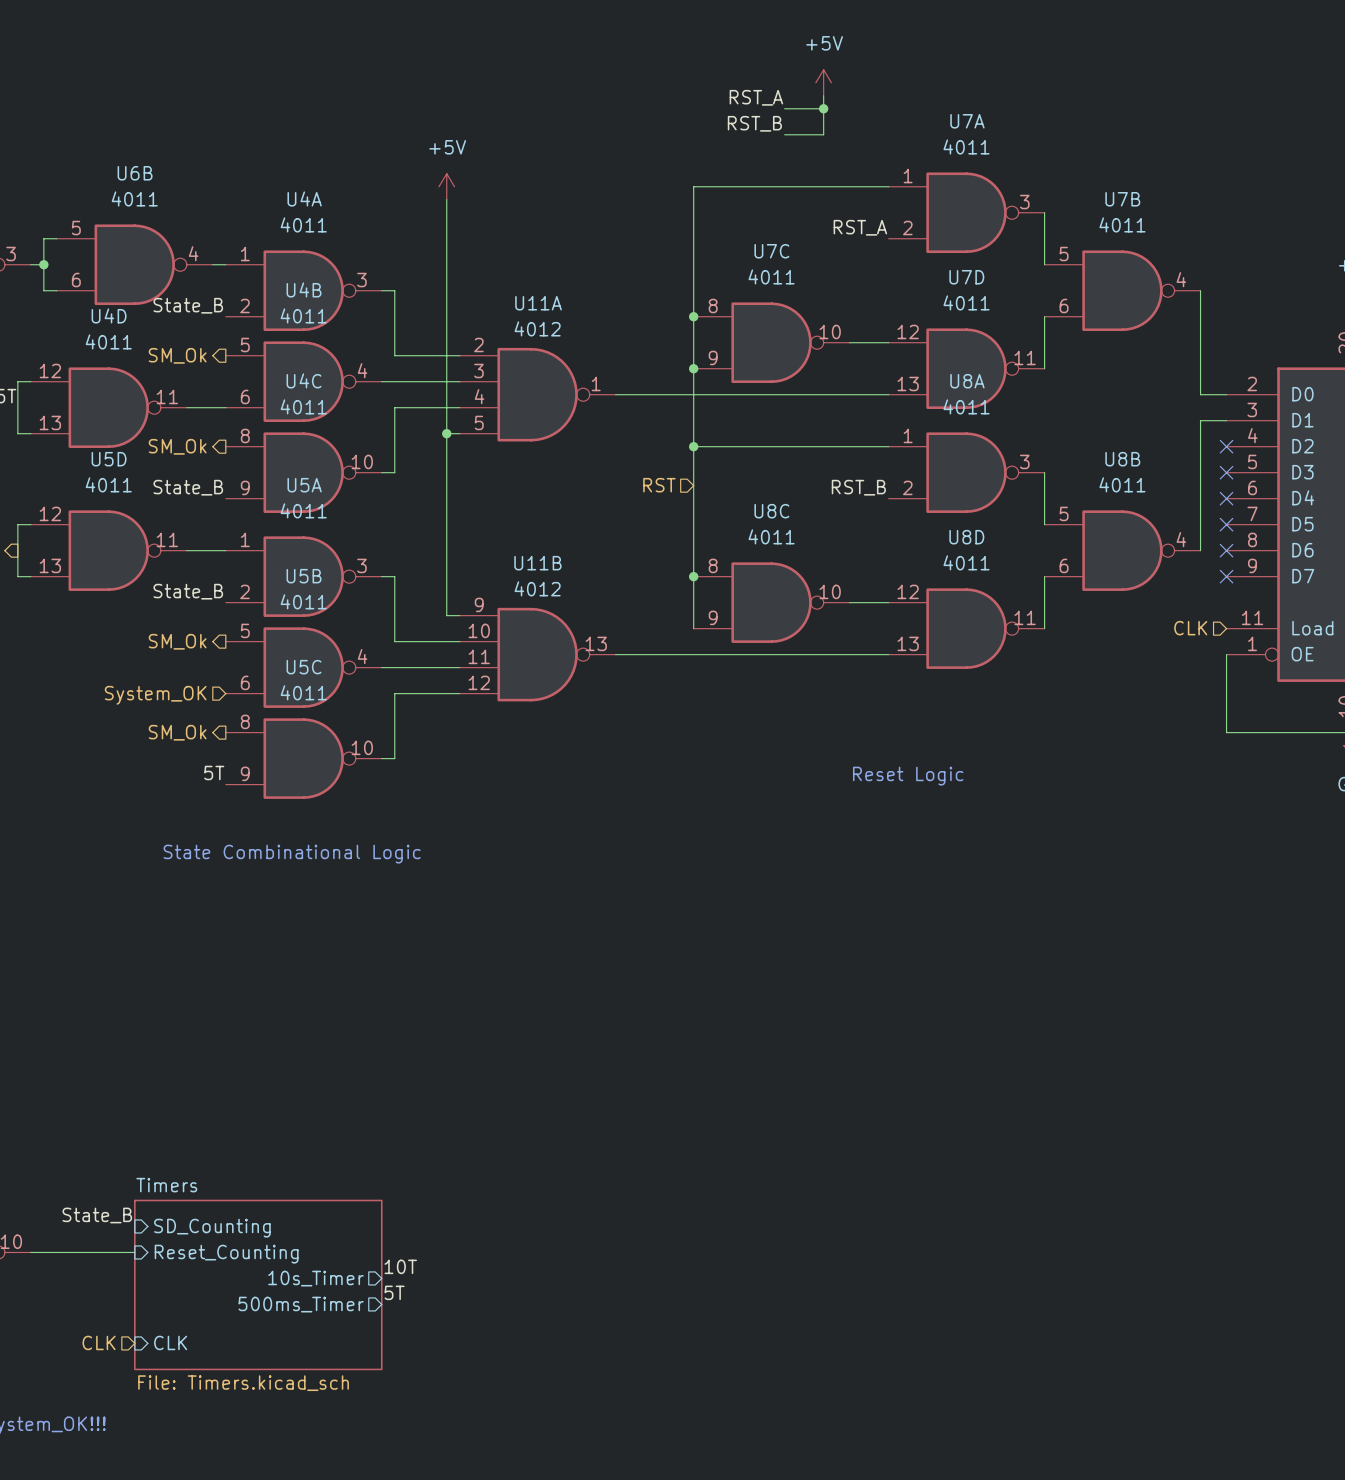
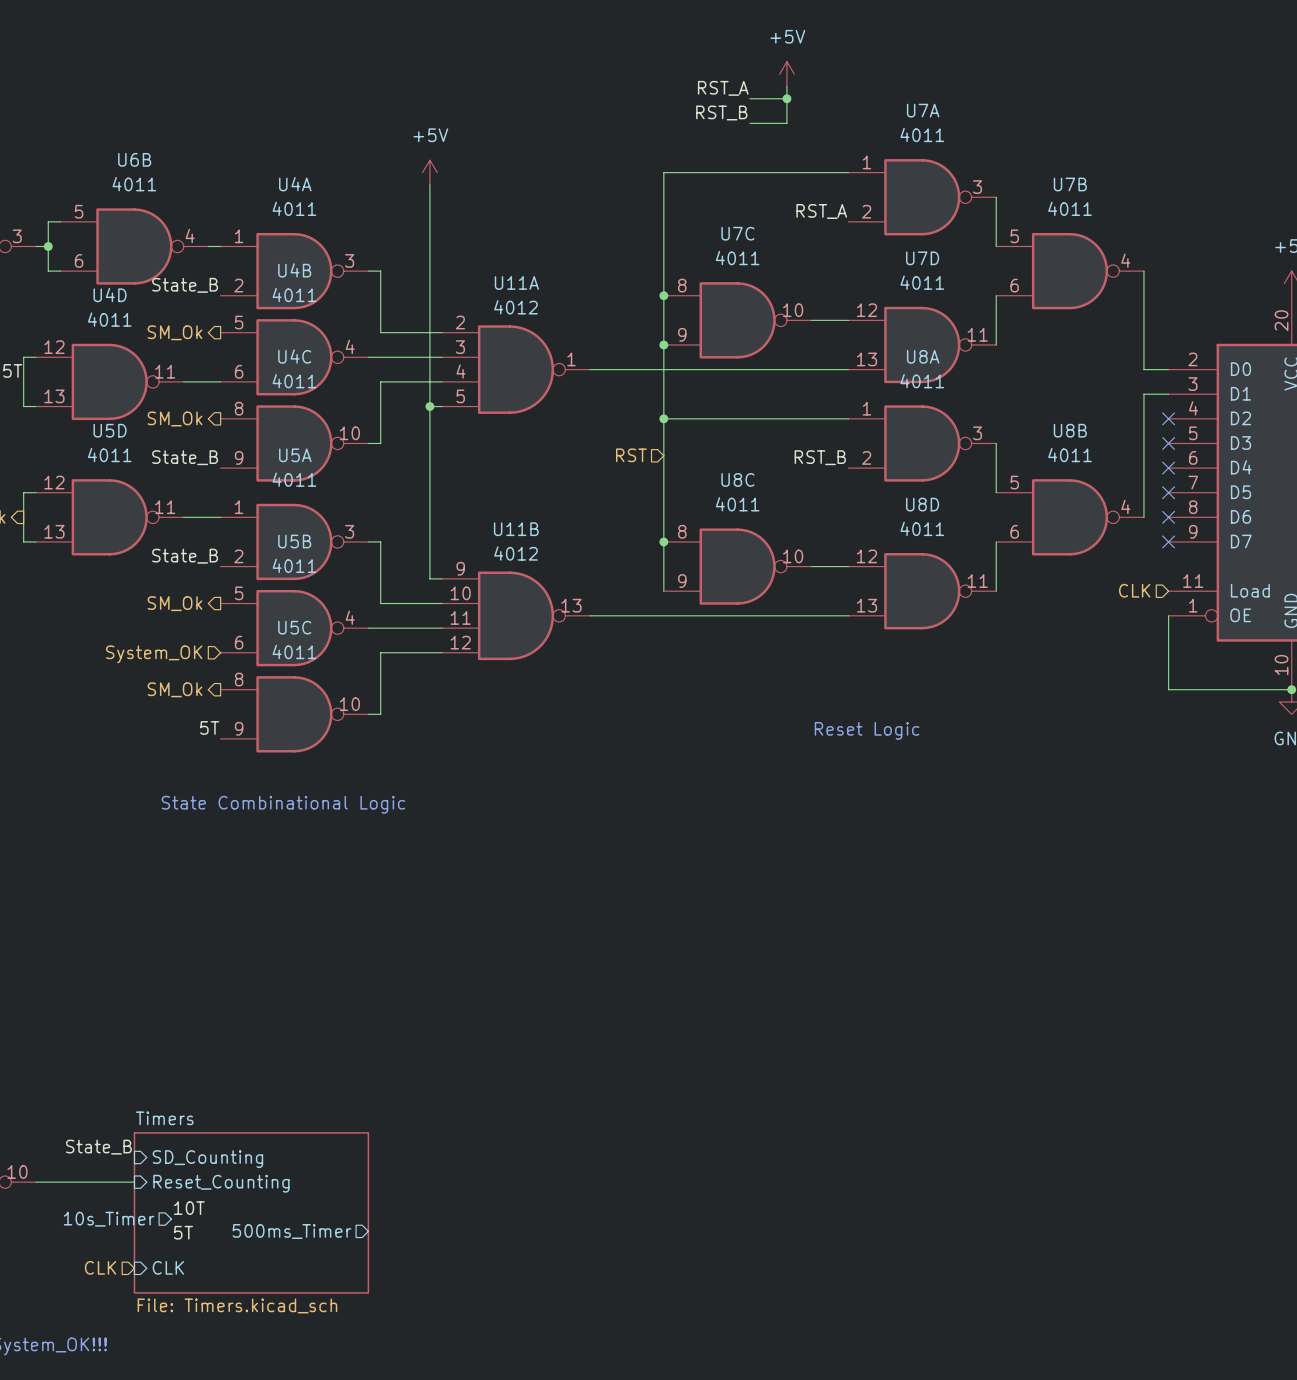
label position: 10T (400, 1266) -> 10T (189, 1208)
sheet pin position: 10s_Timer (315, 1278) -> 10s_Timer (109, 1219)
label position: 5T (394, 1292) -> 5T (183, 1232)

